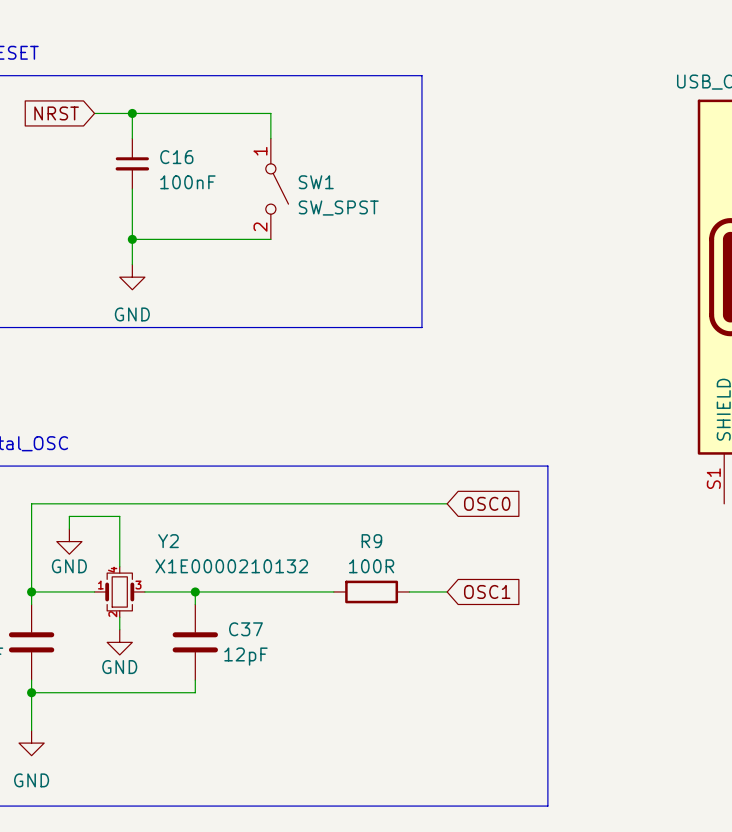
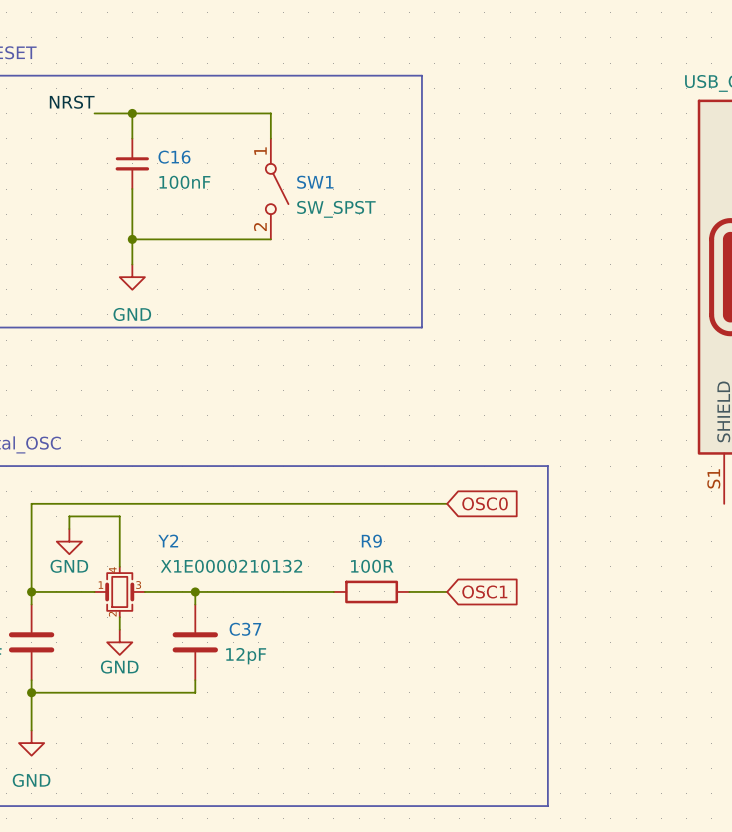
label: none -> NRST (72, 102)
global label: NRST (56, 113) -> none

